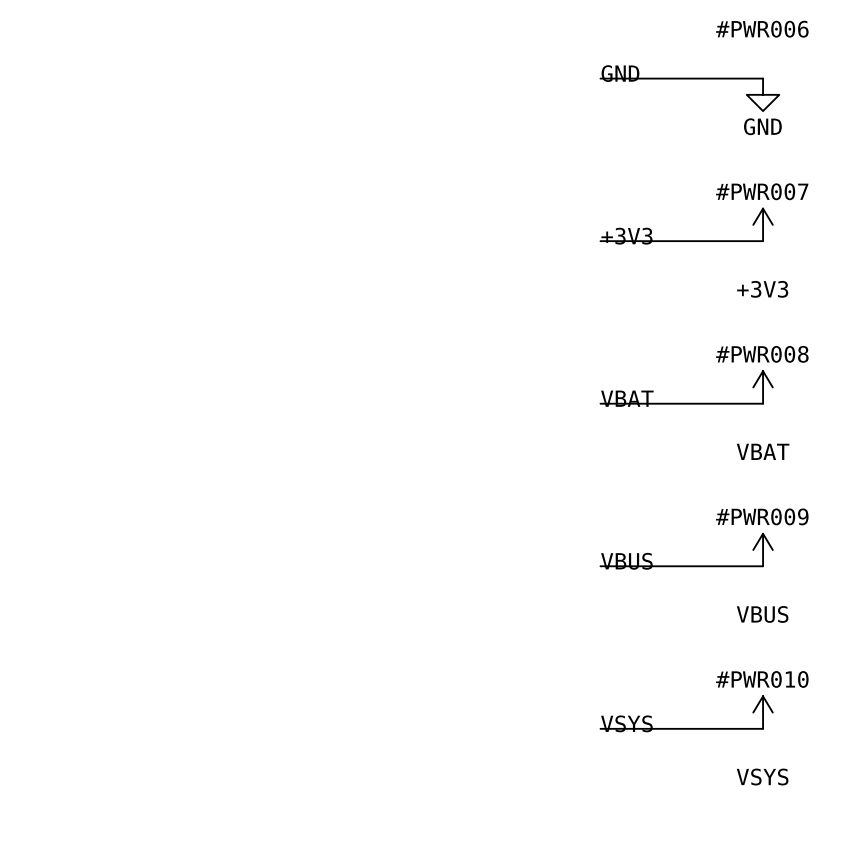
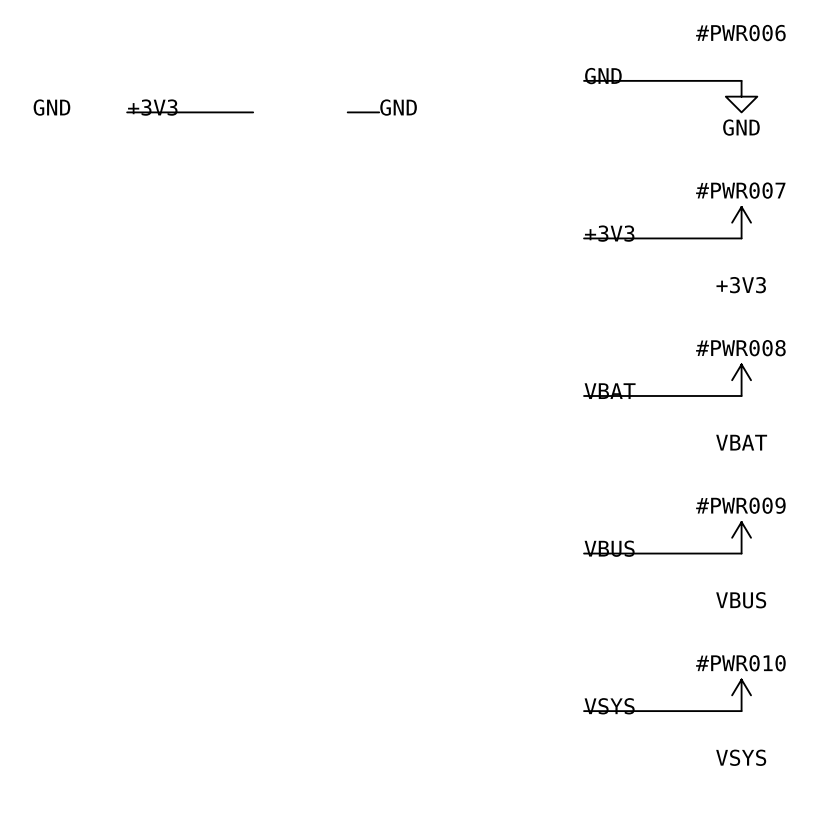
label: none -> GND (51, 107)
label: none -> +3V3 (152, 107)
label: none -> GND (398, 107)
wire: none -> (127, 112) (253, 112)
wire: none -> (347, 112) (379, 112)

